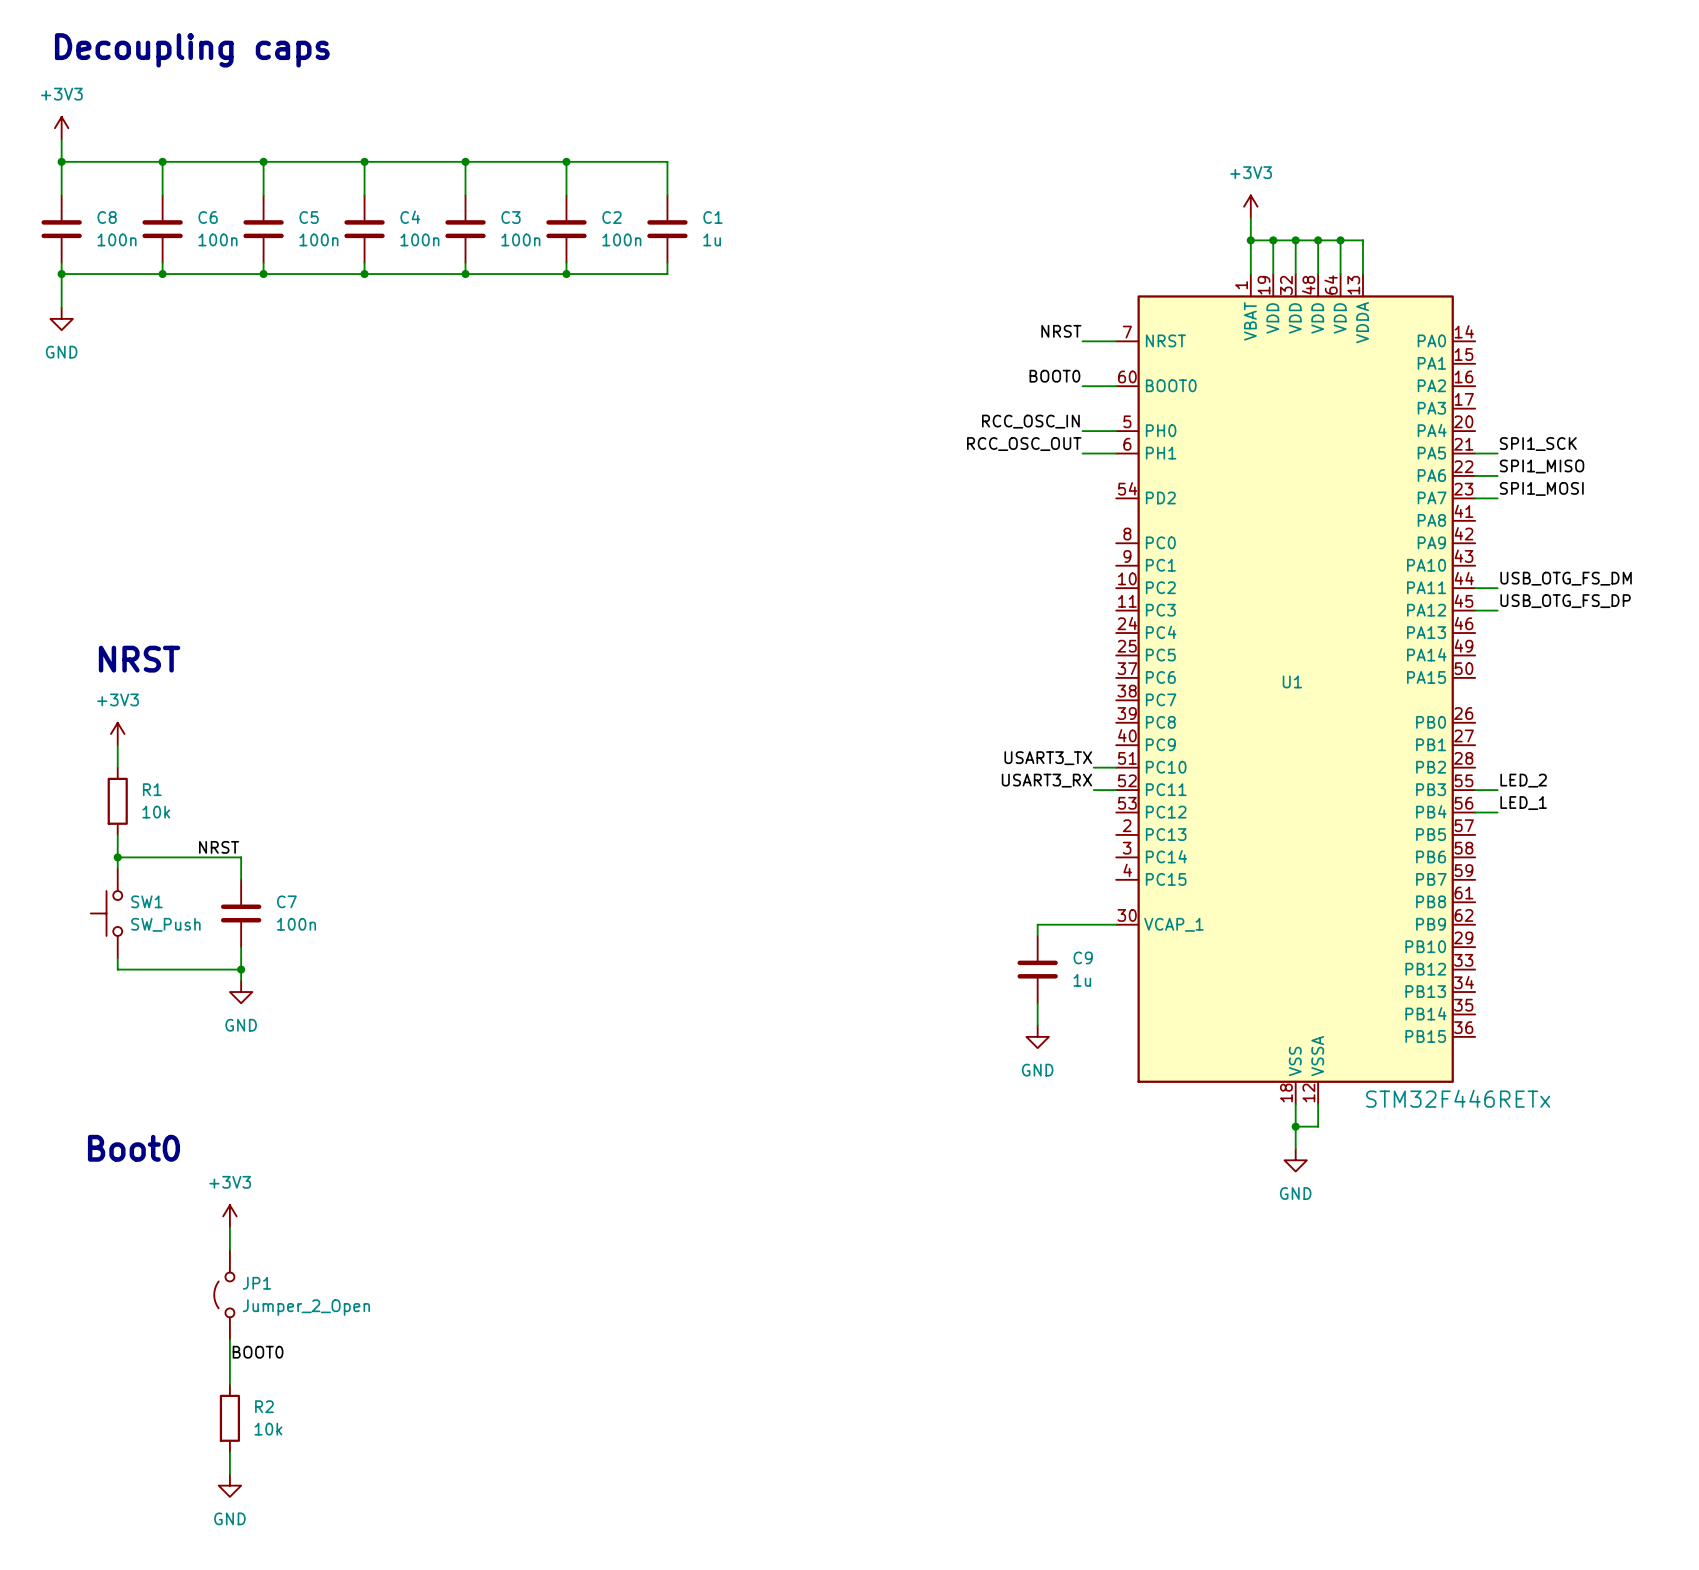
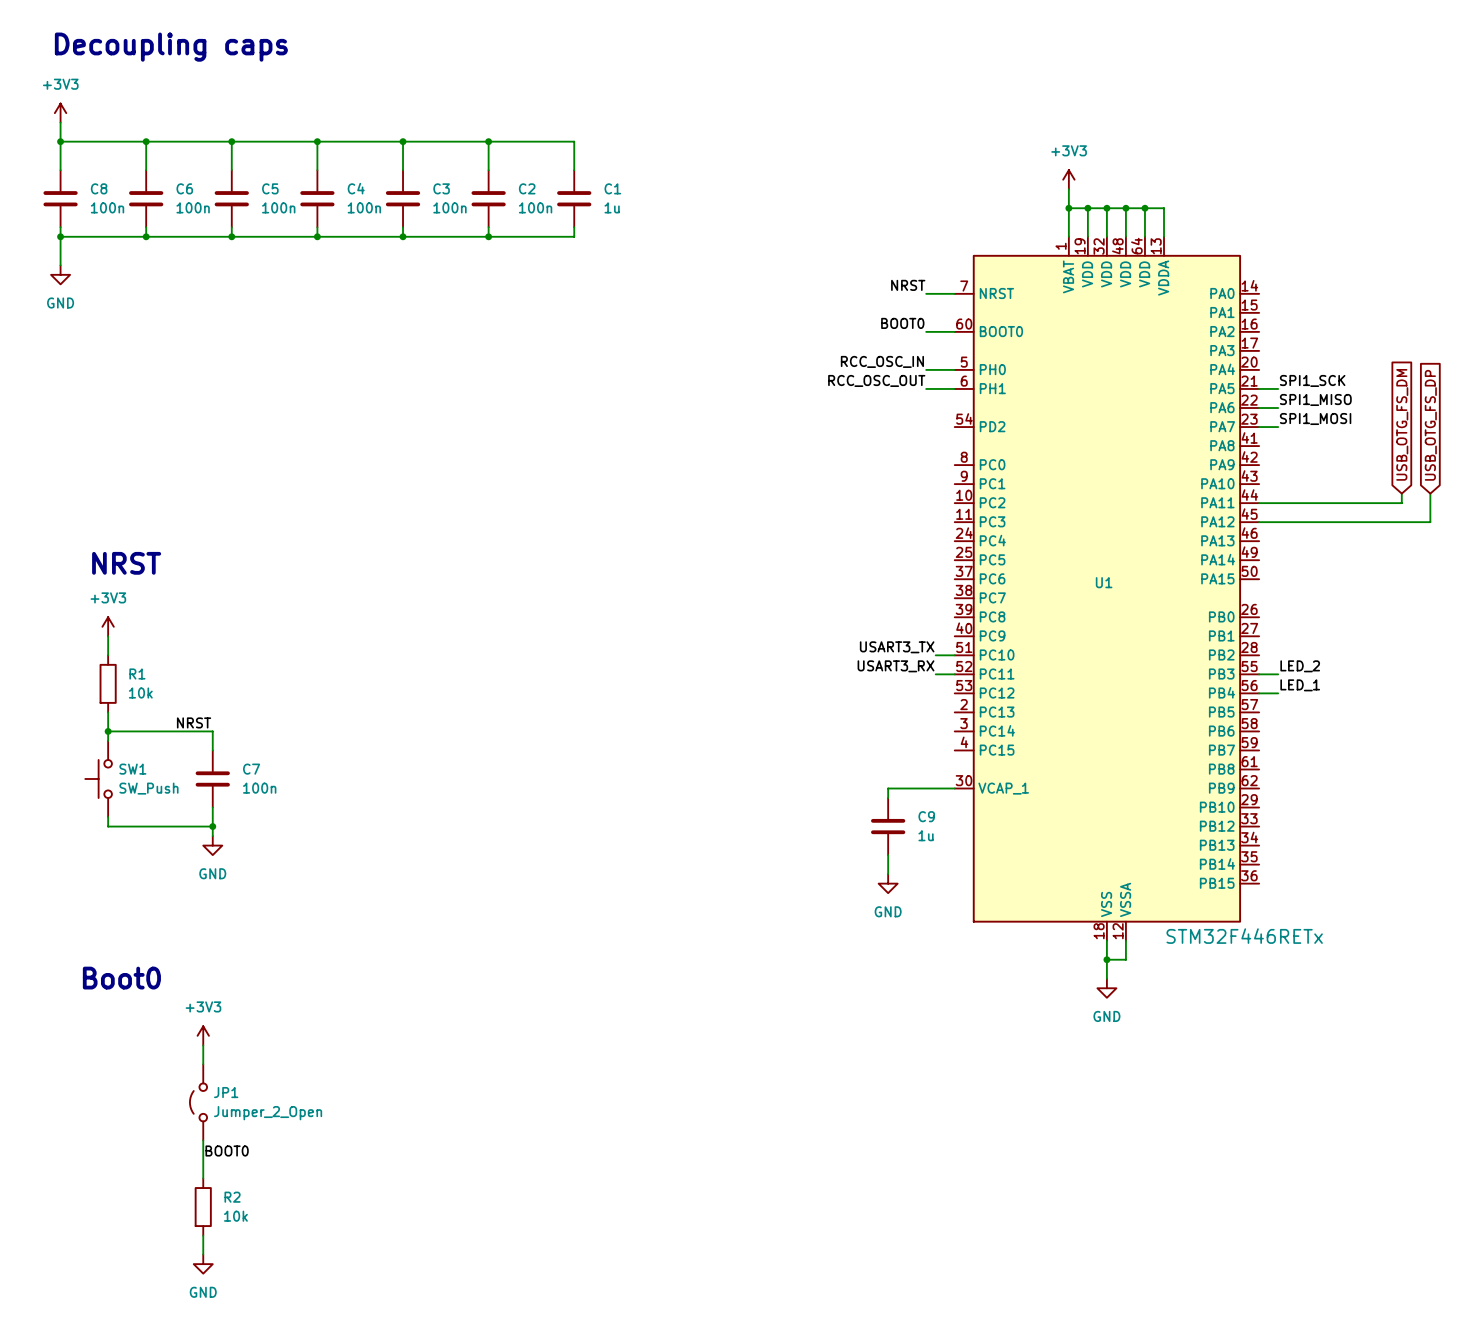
global label: none -> USB_OTG_FS_DM (1402, 424)
global label: none -> USB_OTG_FS_DP (1430, 425)
wire: none -> (1401, 493) (1401, 503) (1278, 503)
wire: none -> (1430, 493) (1430, 522) (1278, 522)
label: USB_OTG_FS_DM (1566, 578) -> none
label: USB_OTG_FS_DP (1565, 601) -> none

